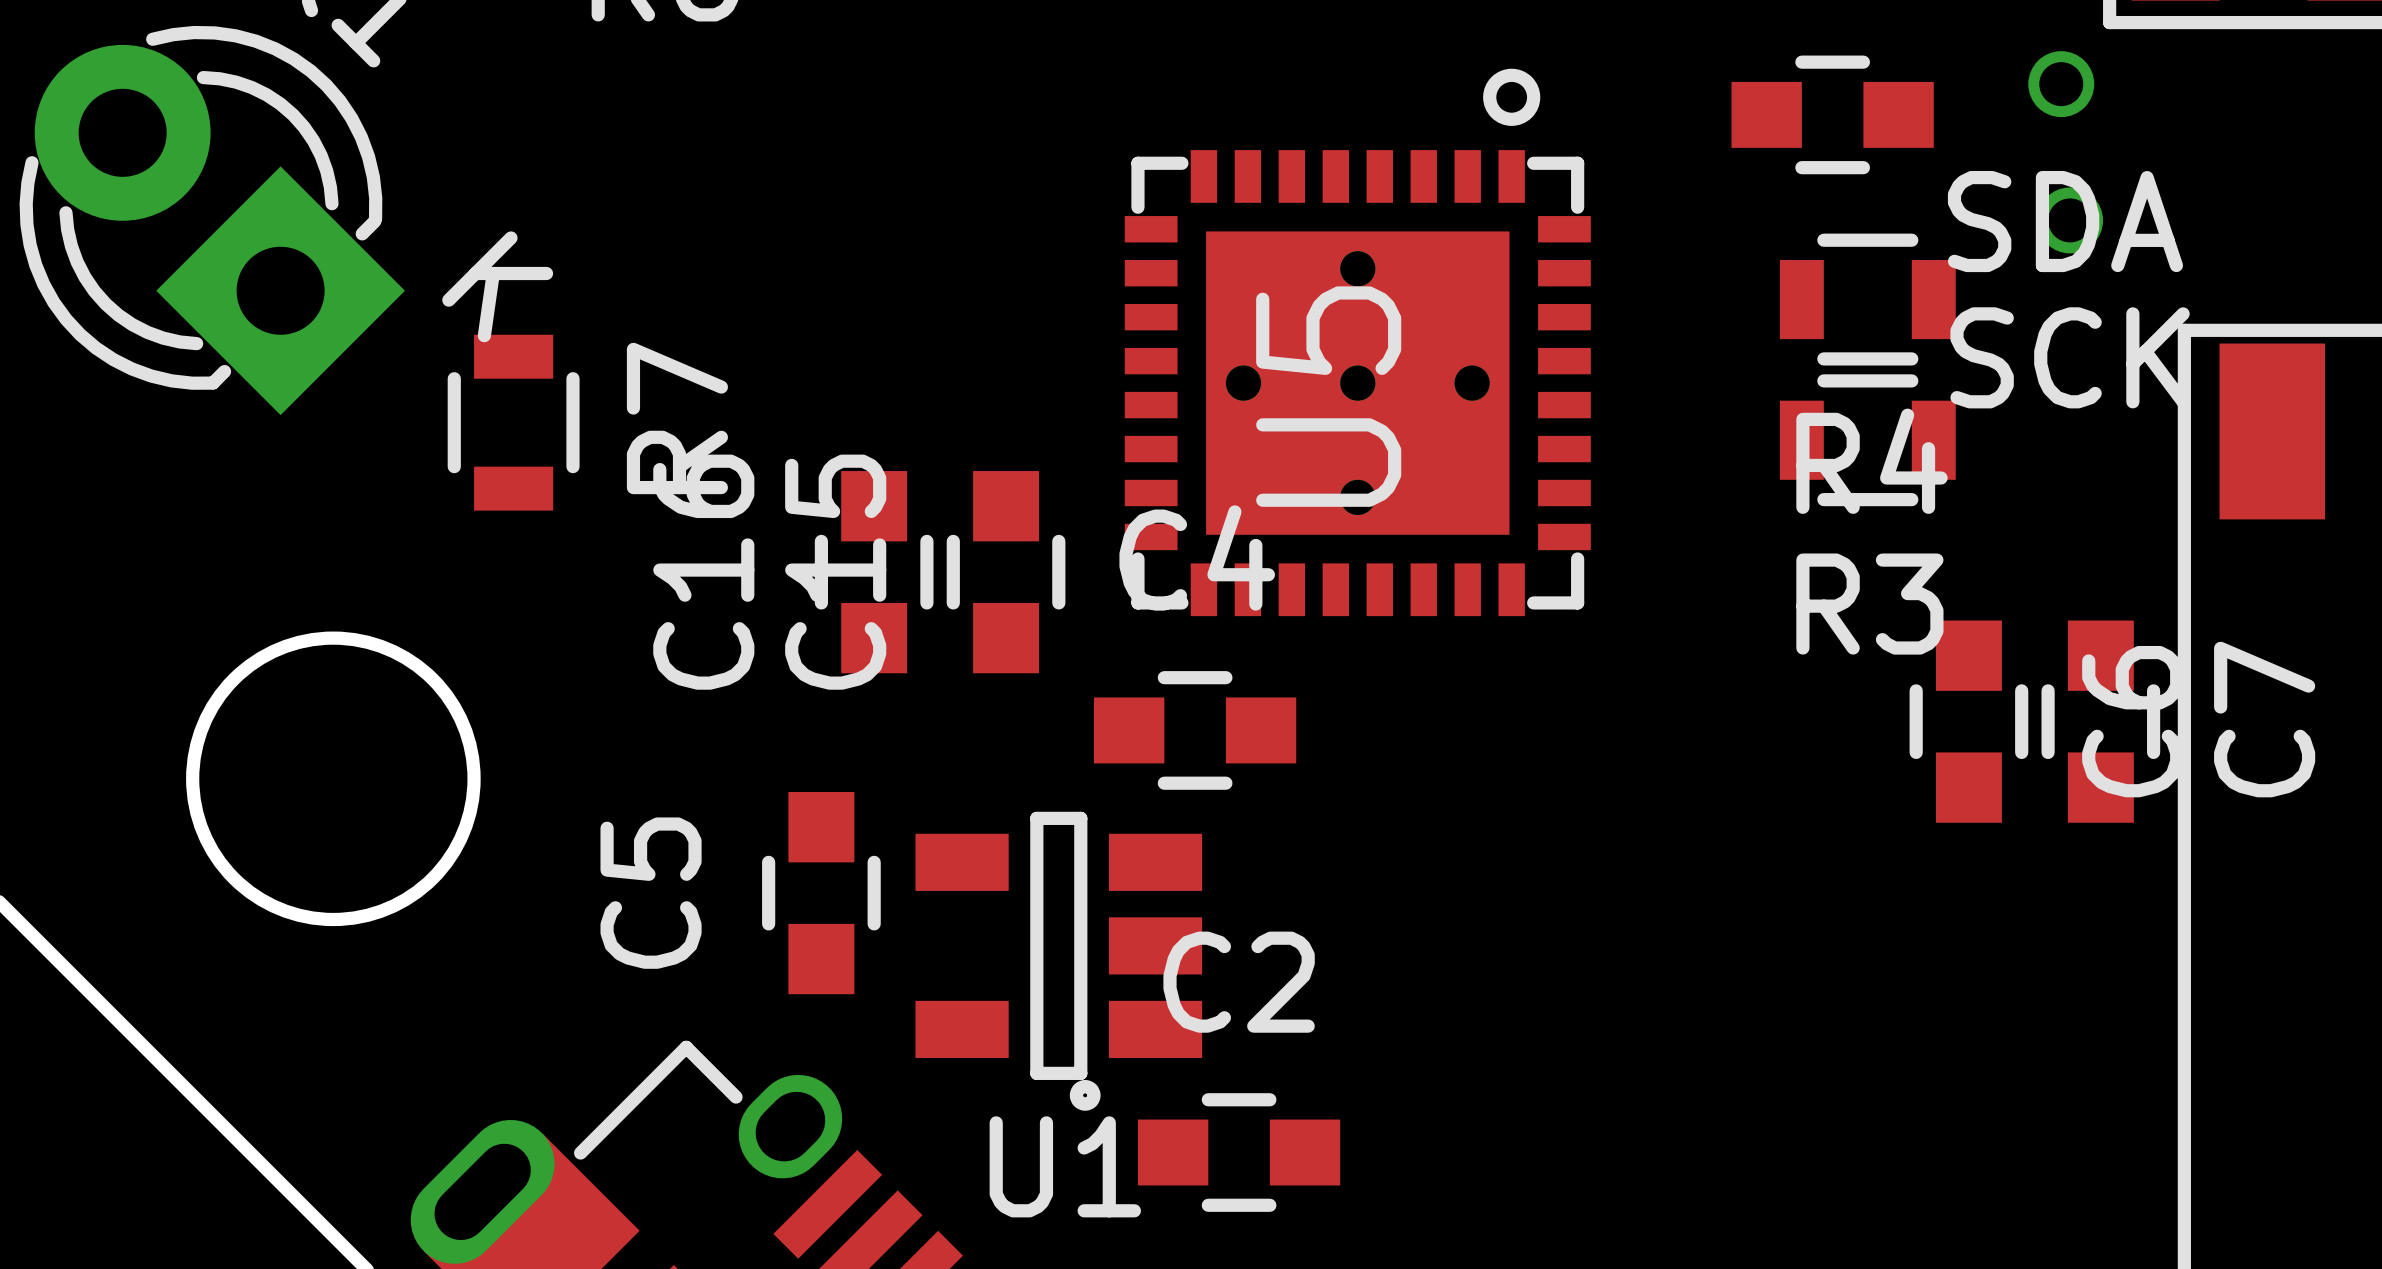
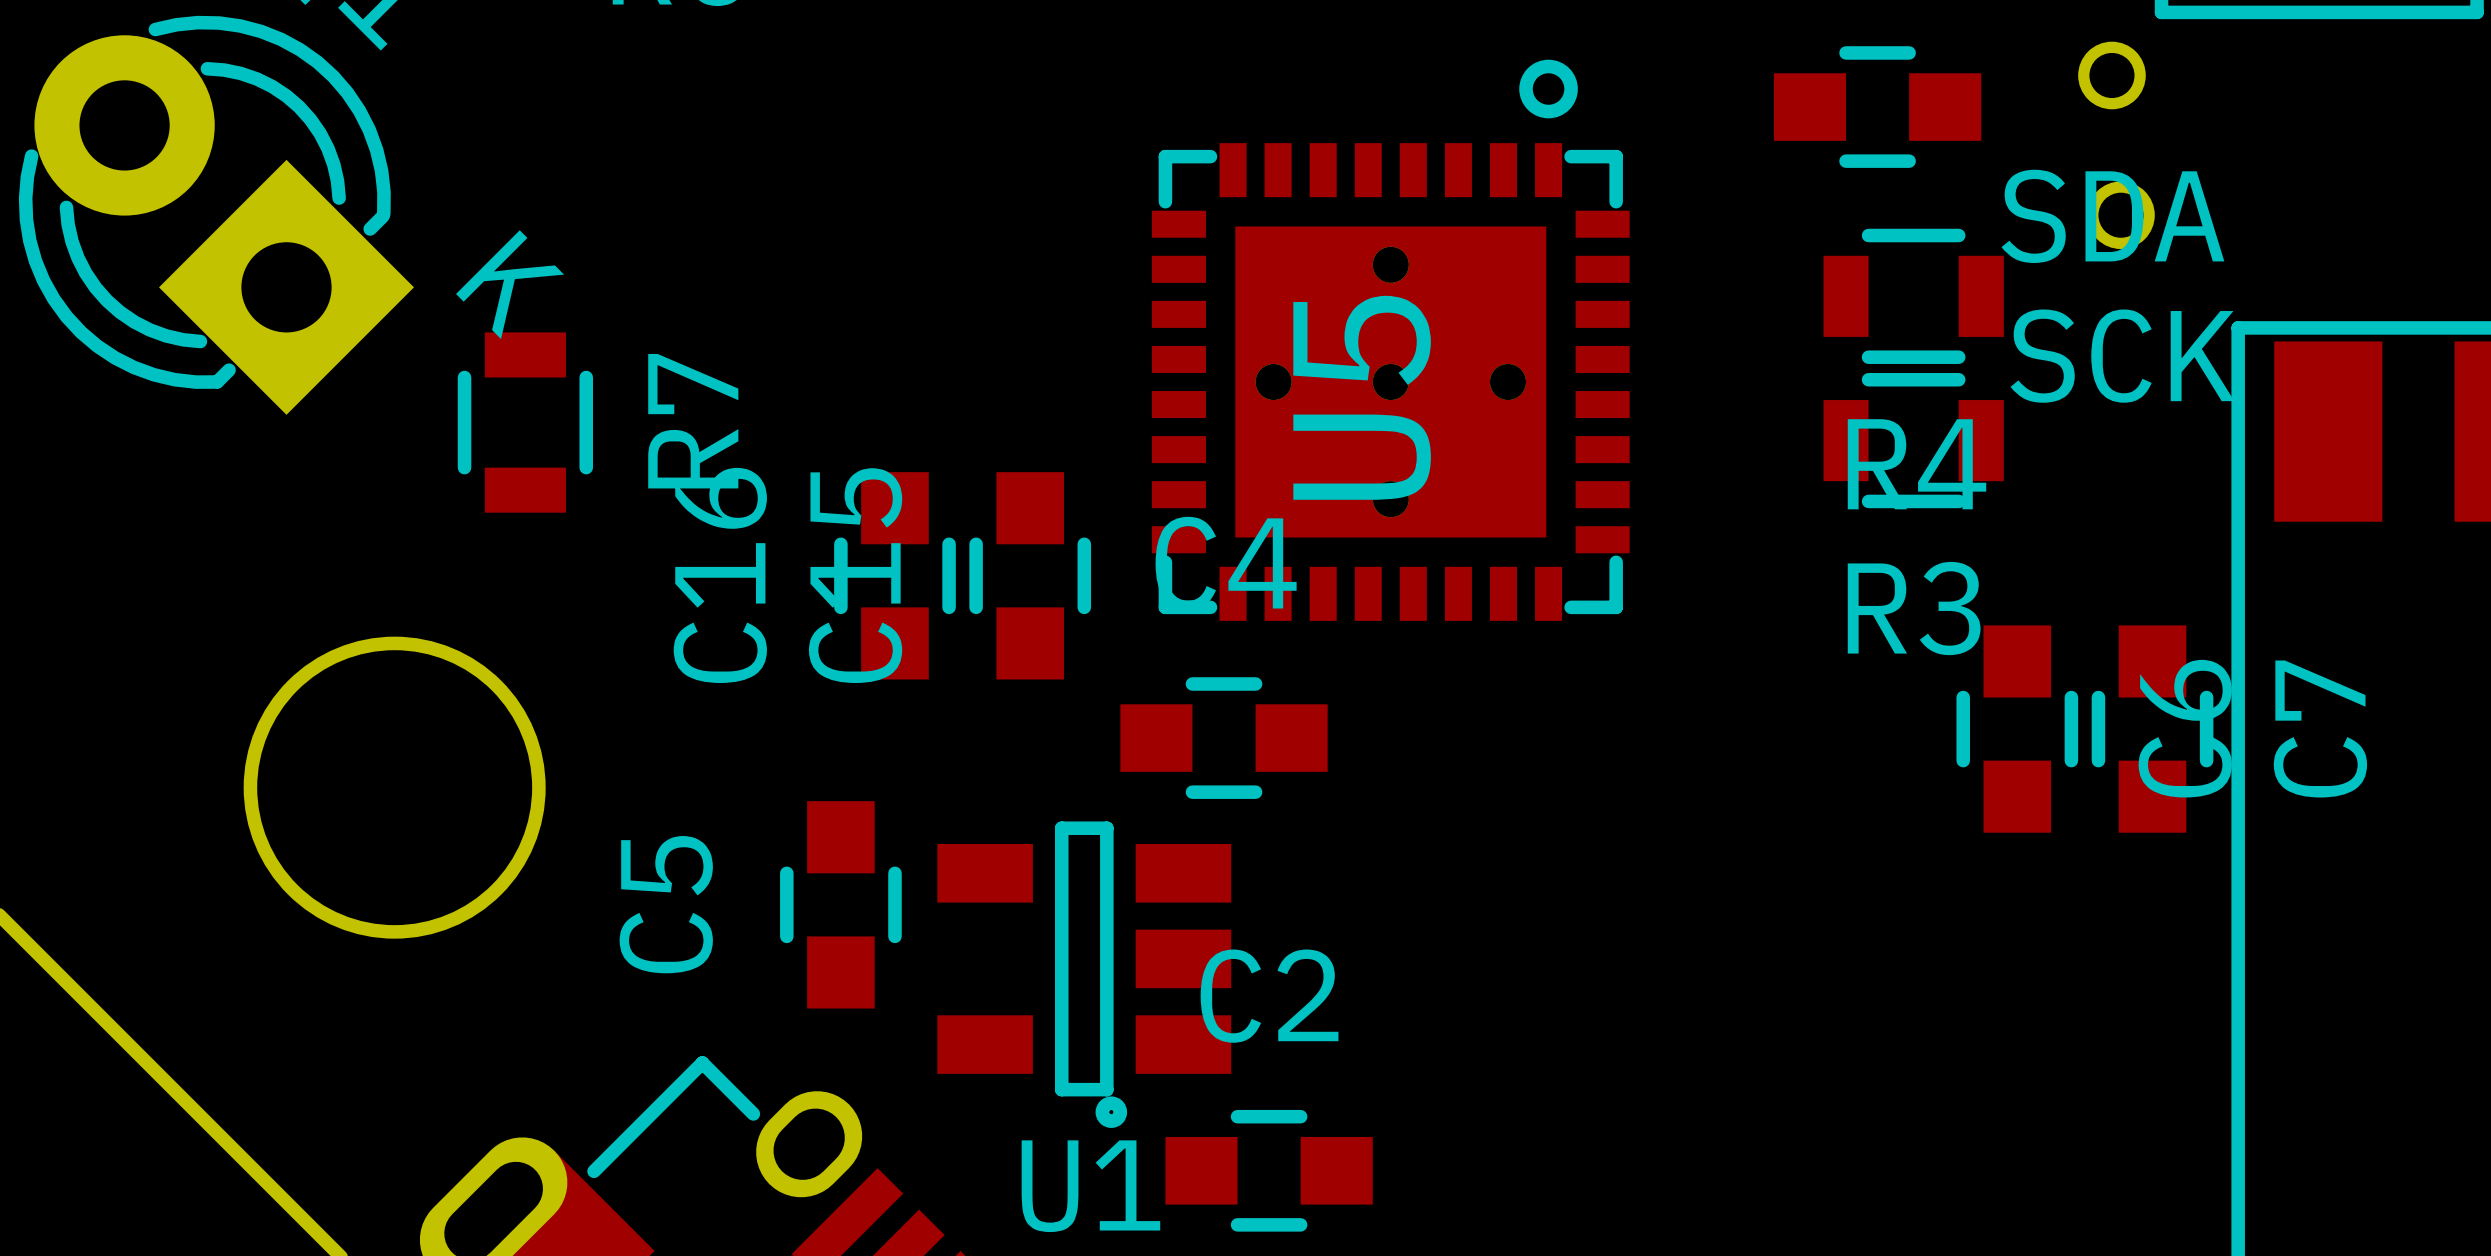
round board edge position: (333, 778) -> (394, 787)

